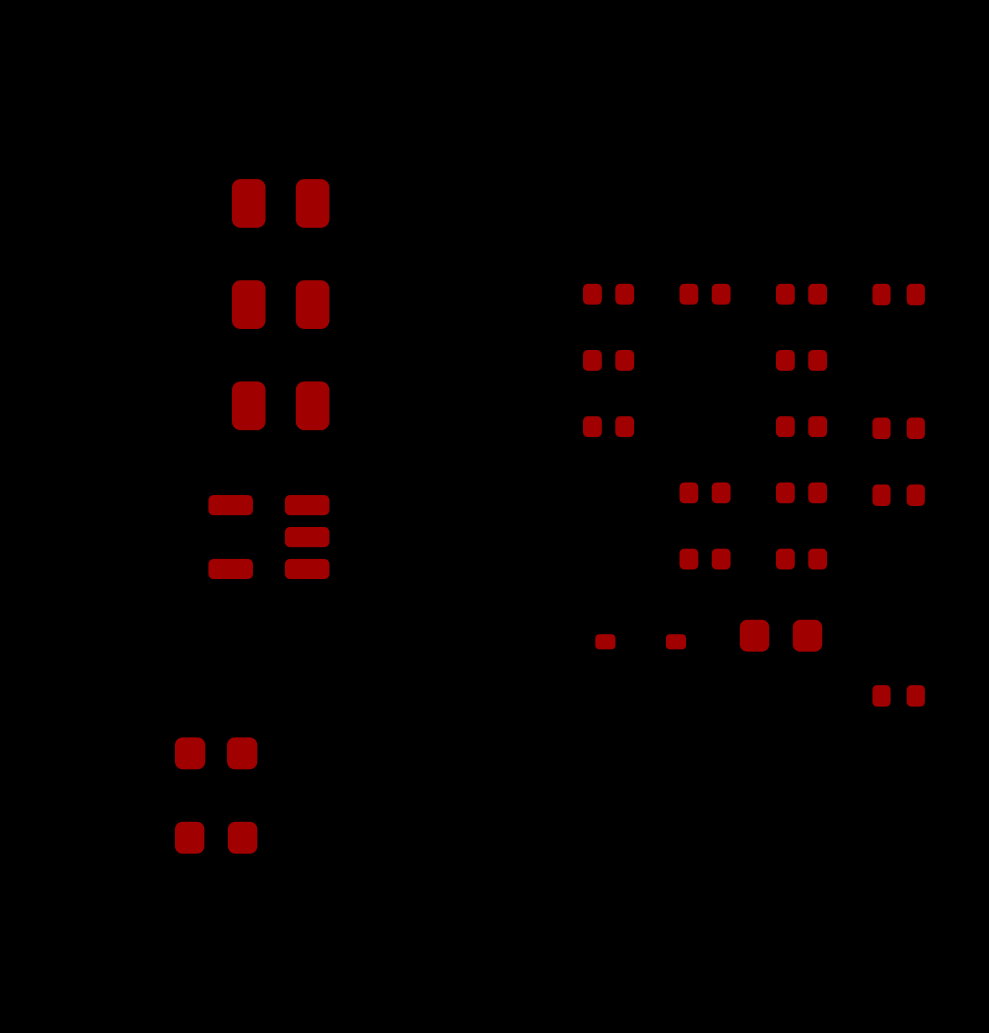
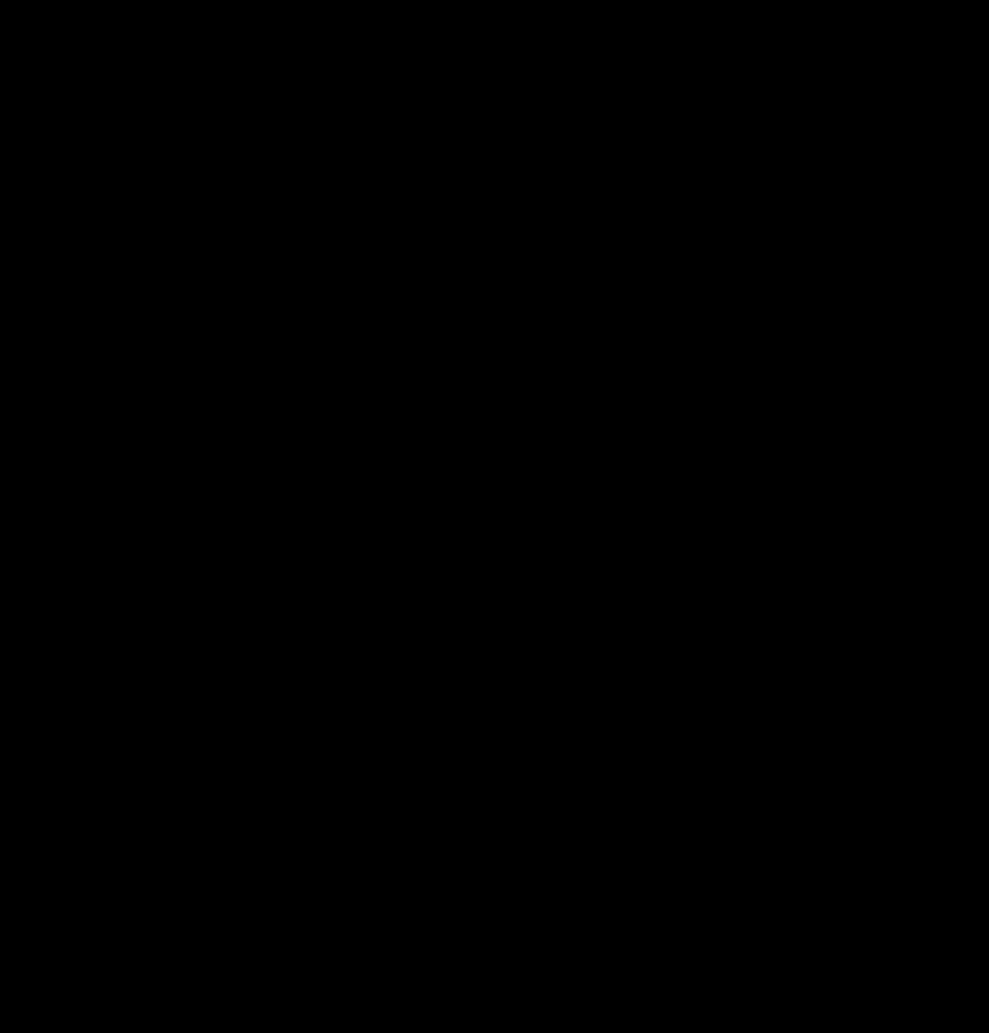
part: (280, 203) -> none
part: (608, 294) -> none
part: (705, 294) -> none
part: (801, 294) -> none
part: (898, 294) -> none
part: (280, 304) -> none
part: (608, 360) -> none
part: (801, 360) -> none
part: (280, 405) -> none
part: (608, 426) -> none
part: (801, 426) -> none
part: (898, 428) -> none
part: (705, 492) -> none
part: (801, 492) -> none
part: (898, 495) -> none
part: (268, 537) -> none
part: (705, 559) -> none
part: (801, 559) -> none
part: (781, 635) -> none
part: (640, 641) -> none
part: (898, 695) -> none
part: (216, 753) -> none
part: (216, 837) -> none

